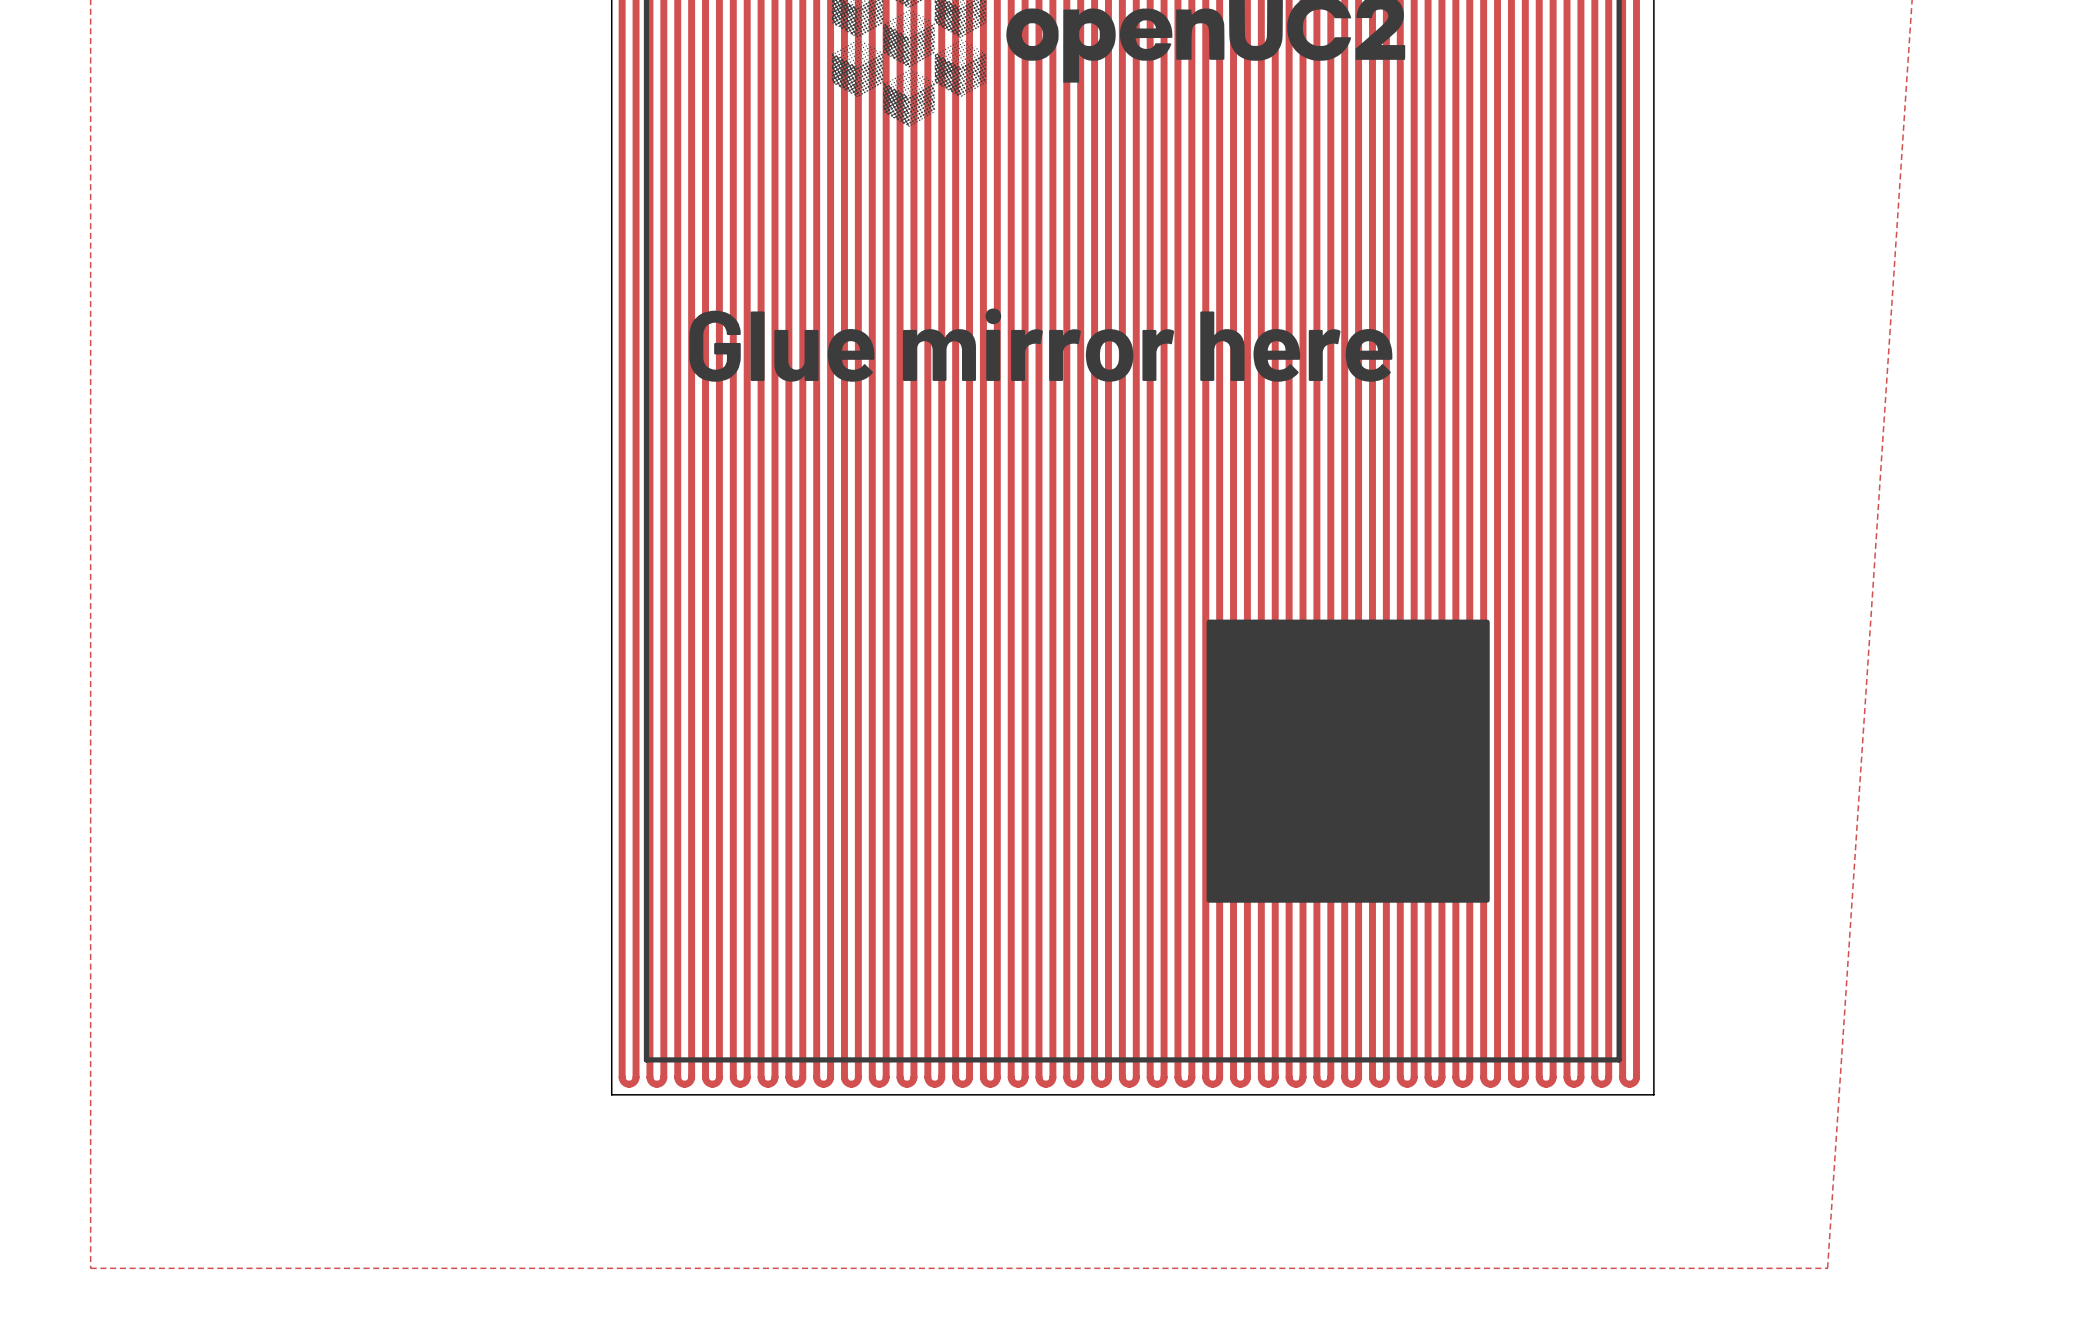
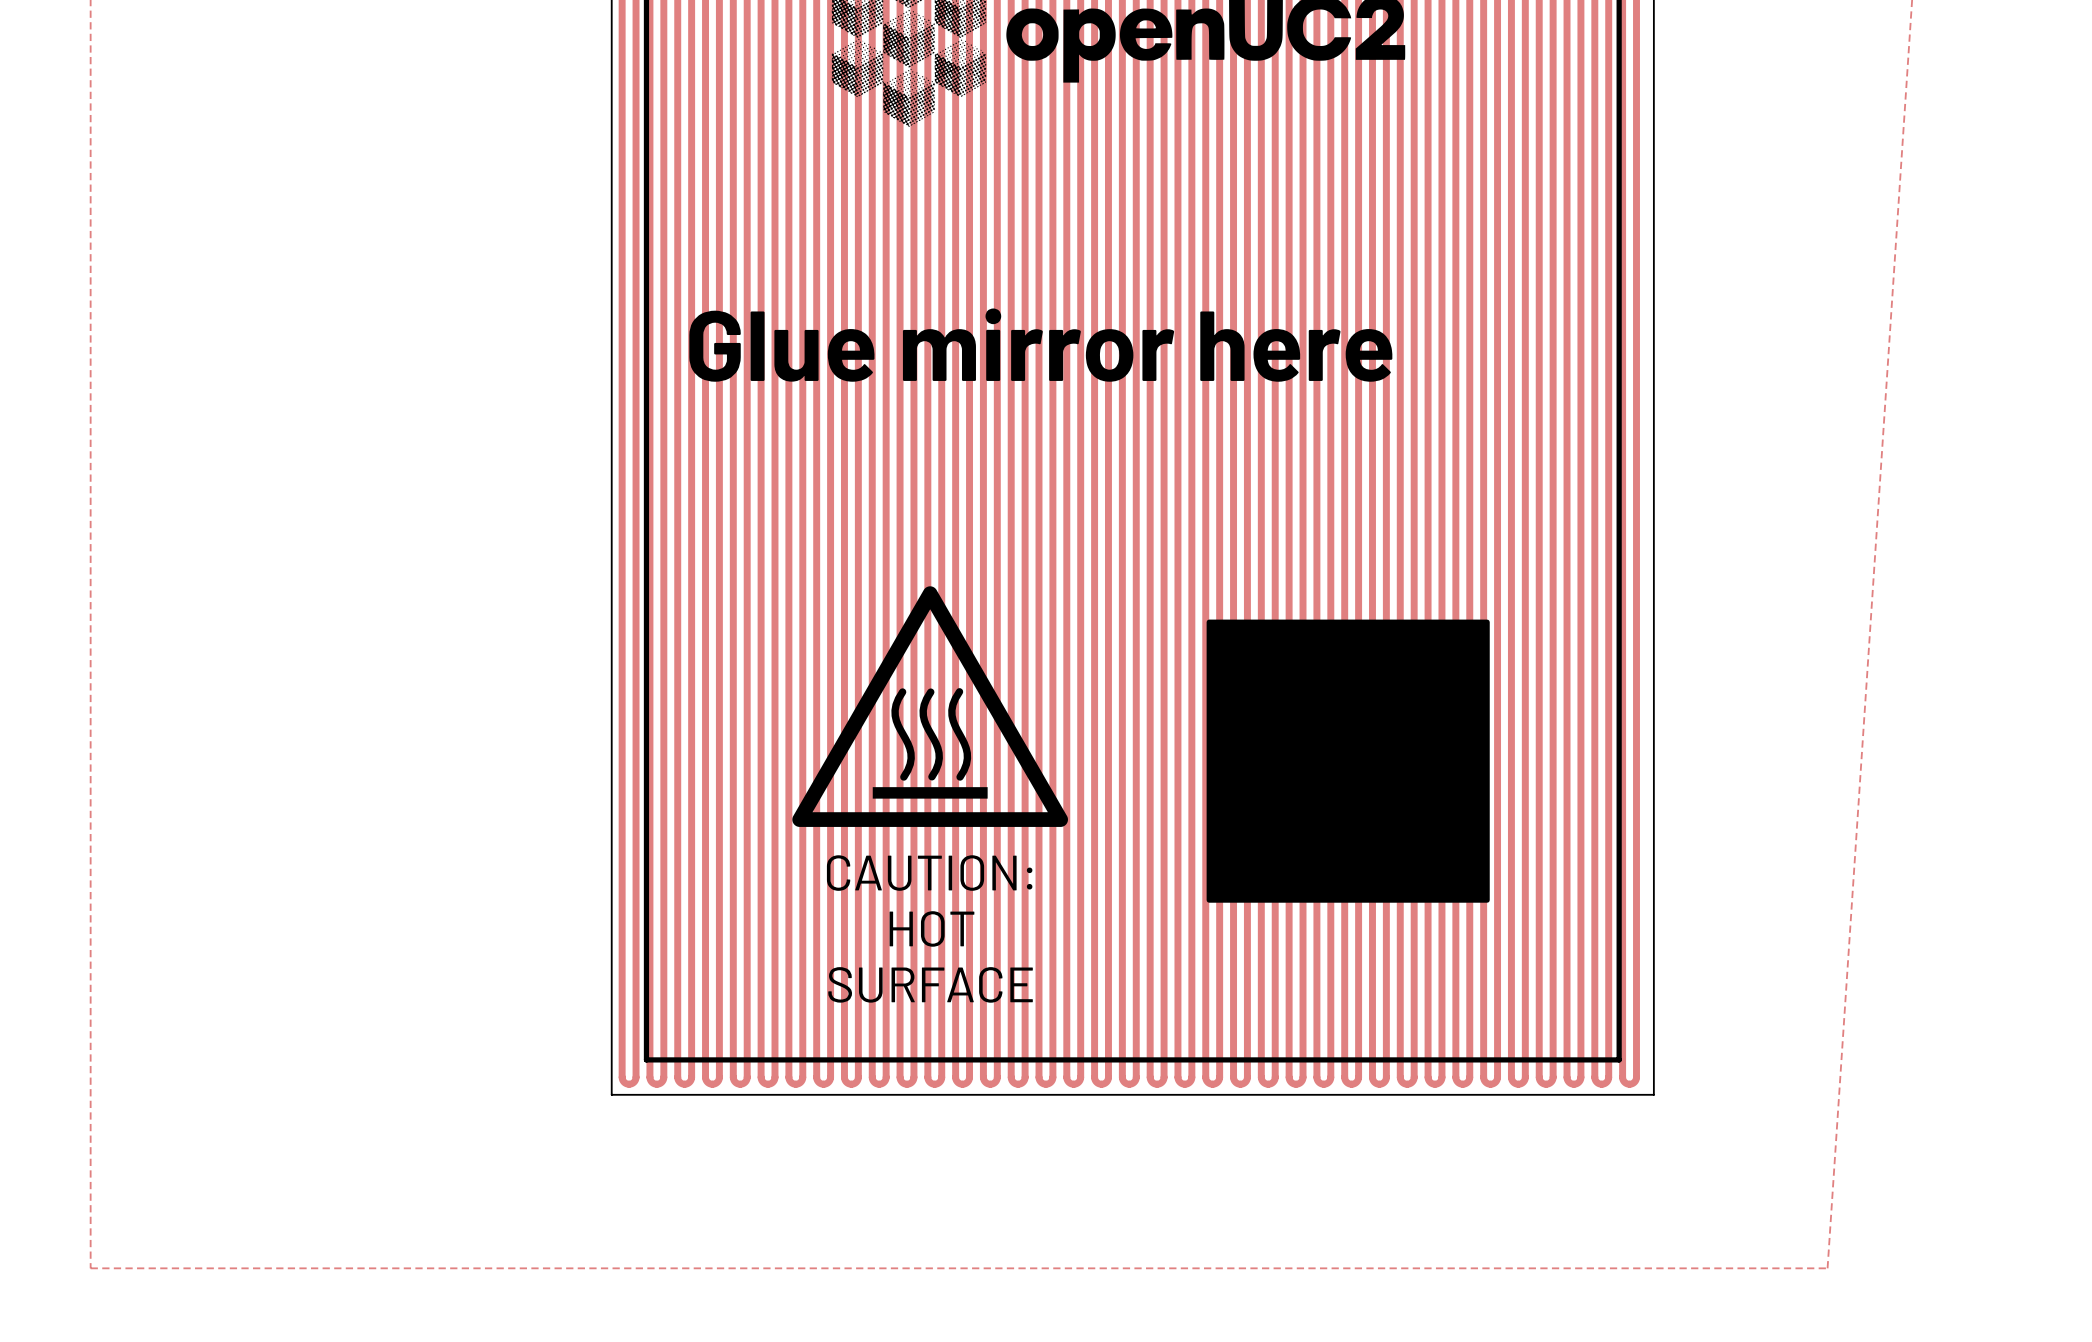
drawing: none -> [792, 586, 1068, 827]
line: none -> (959, 691) (951, 710) (953, 720) (967, 753) (966, 764) (960, 777)
line: none -> (902, 692) (895, 710) (896, 720) (910, 753) (910, 764) (903, 777)
line: none -> (930, 692) (923, 710) (924, 720) (939, 753) (938, 763) (931, 776)
text: none -> CAUTION: (929, 873)
text: none -> HOT (931, 928)
text: none -> SURFACE (930, 984)

